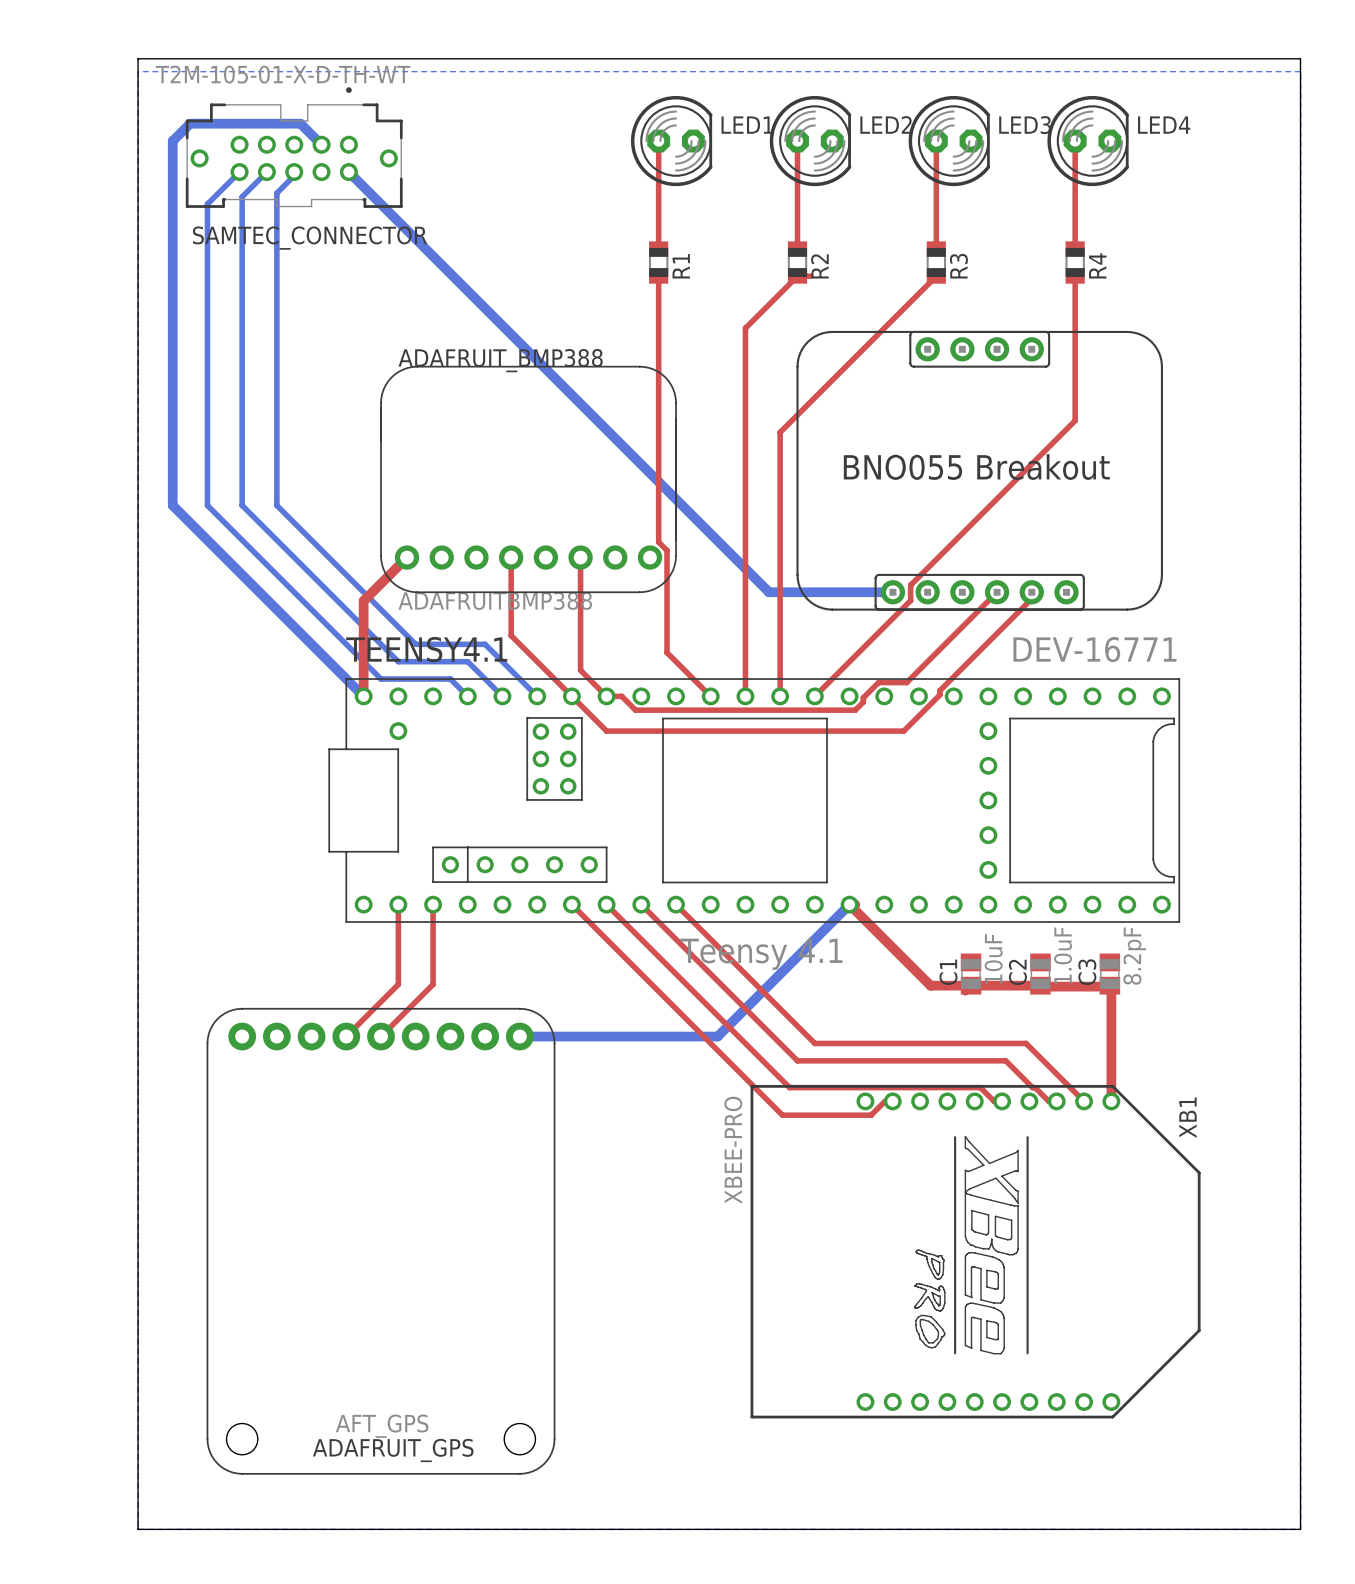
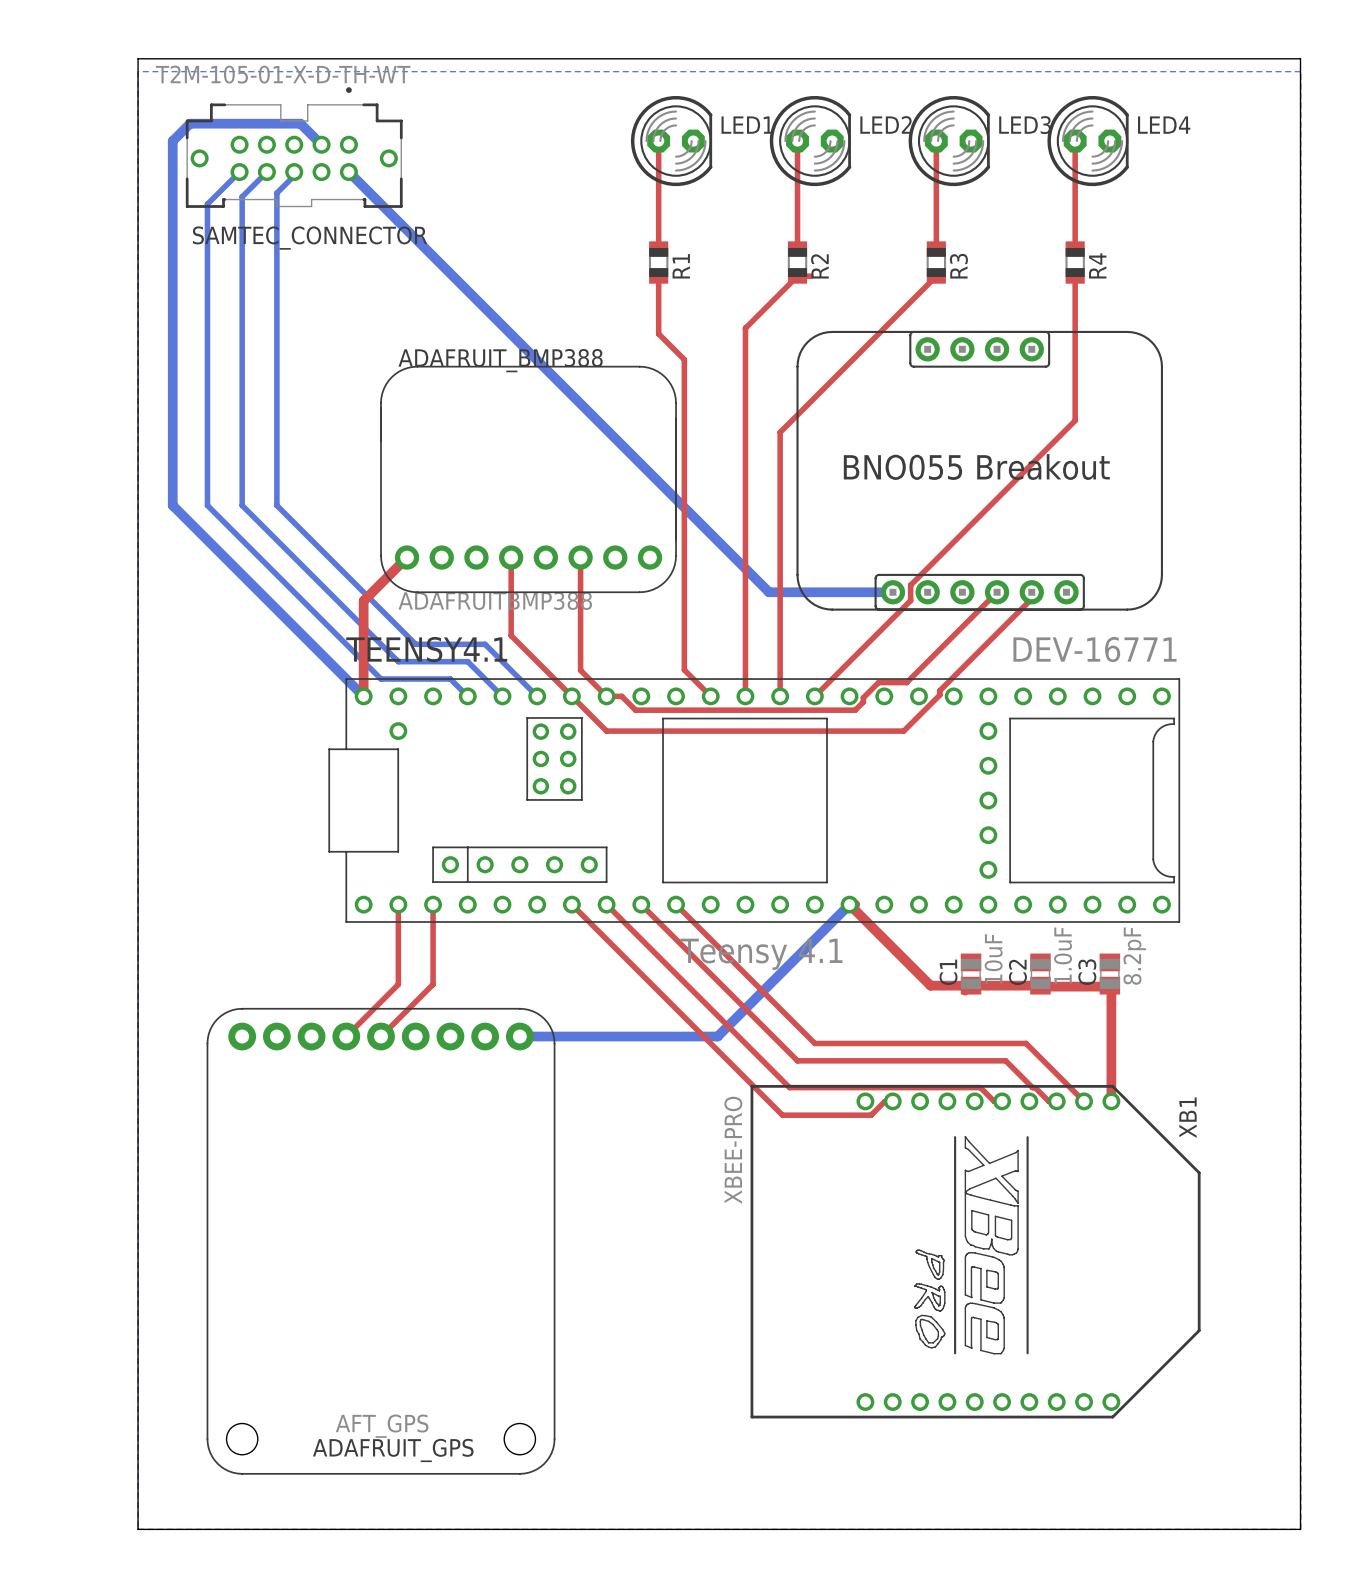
top track: (658, 333) (658, 542) (667, 550) (667, 652) (684, 670) -> (658, 333) (684, 359) (684, 670)

